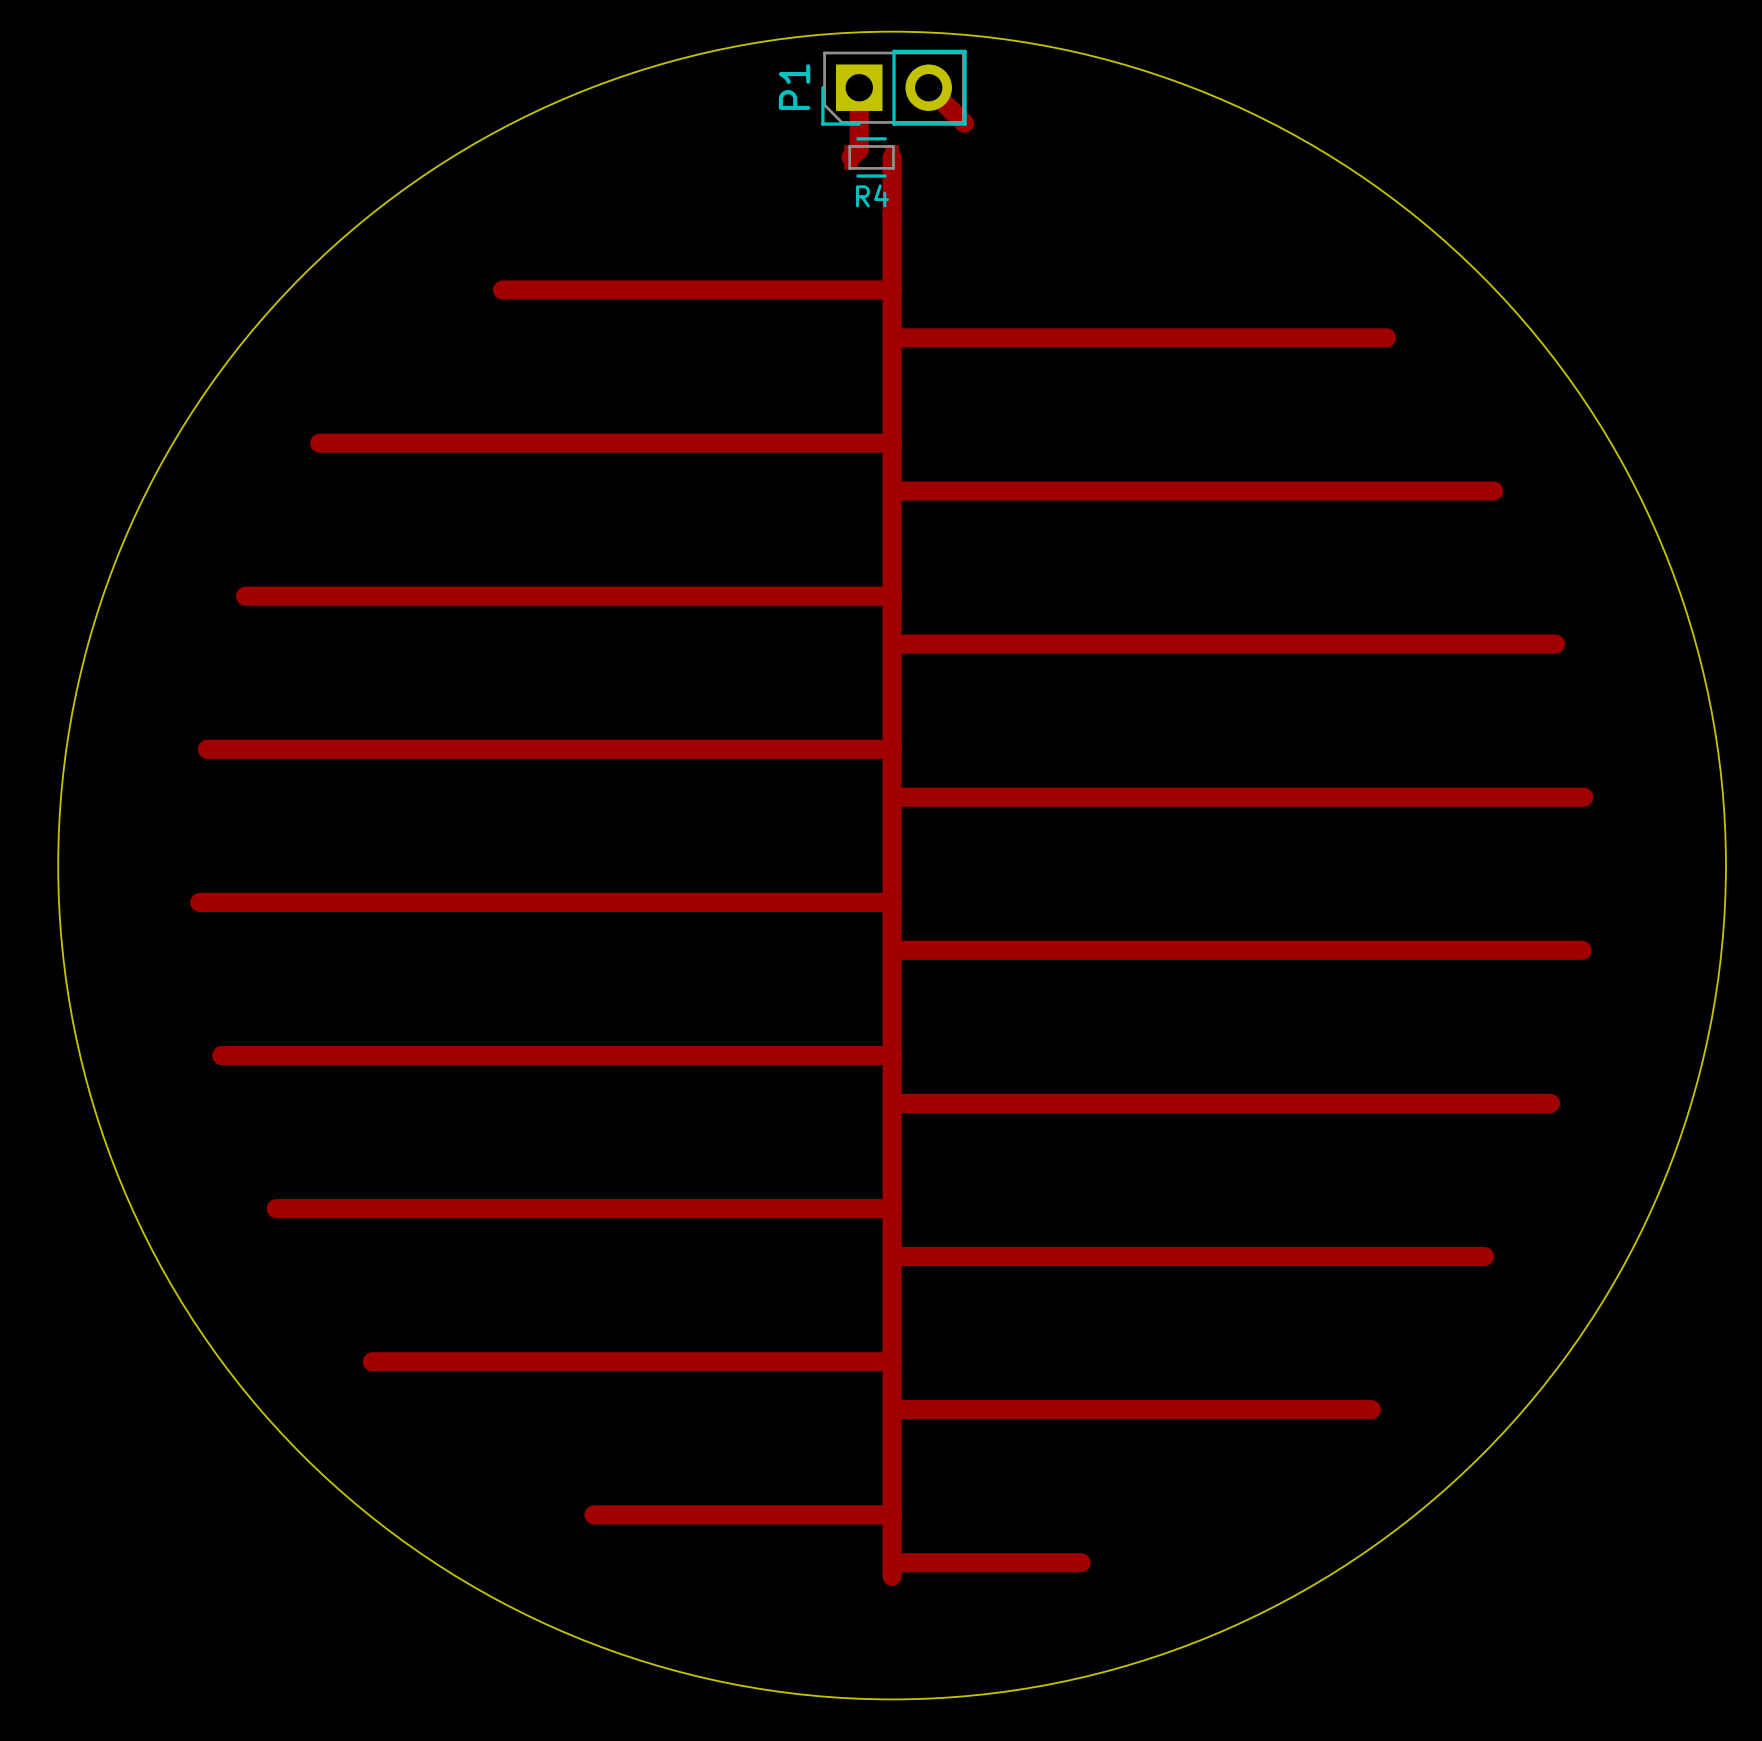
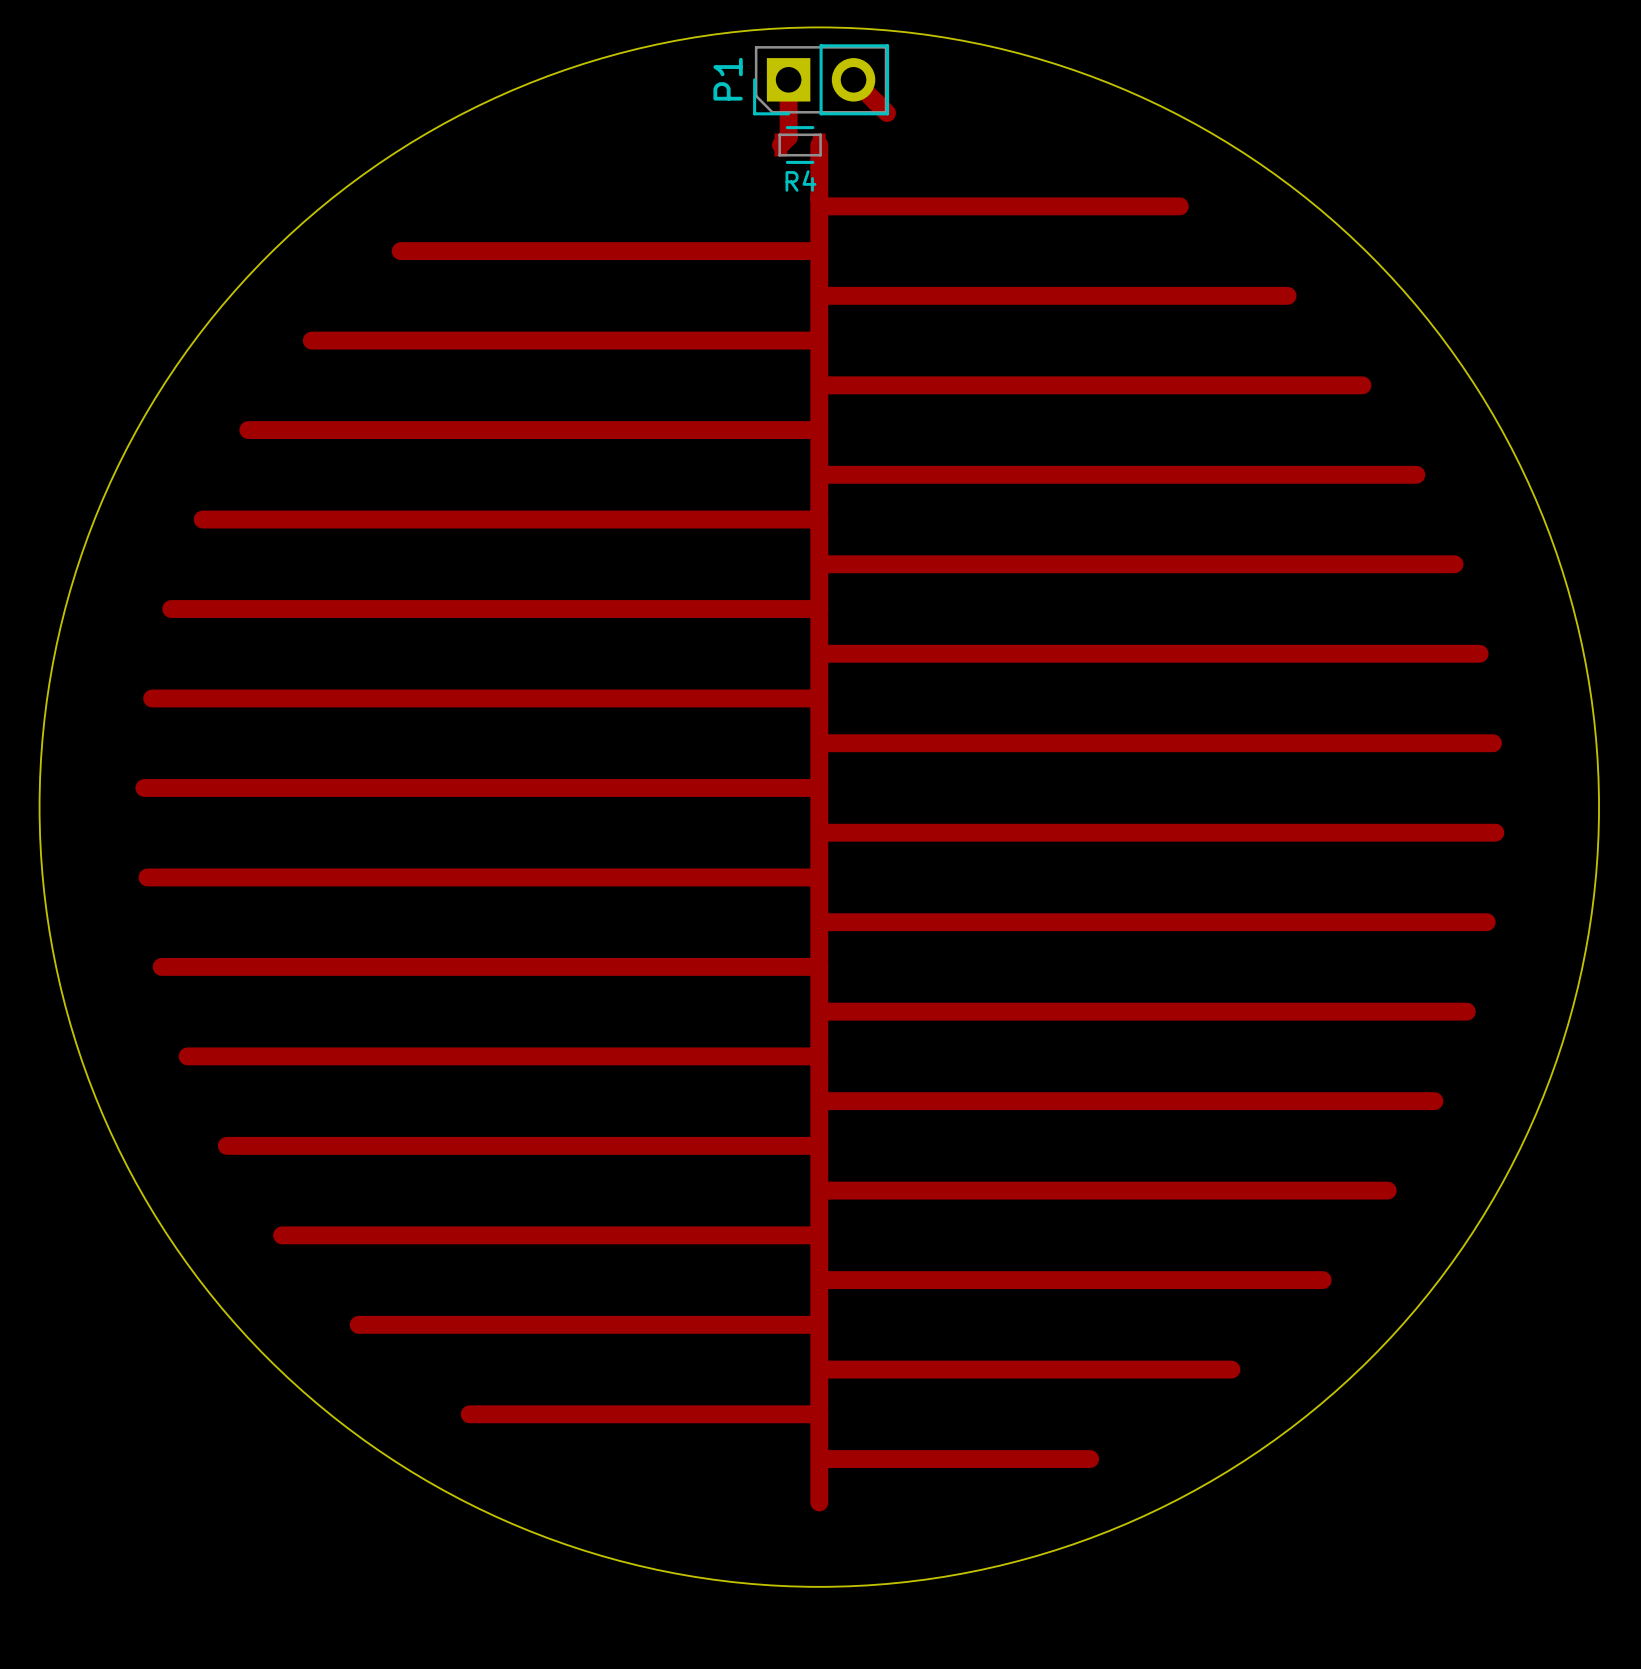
top track: none -> (820, 206) (1179, 206)
top track: none -> (400, 251) (819, 251)
top track: (502, 290) (892, 290) -> none
top track: none -> (820, 295) (1287, 295)
top track: (893, 337) (1386, 337) -> none
top track: none -> (311, 340) (819, 340)
top track: none -> (820, 385) (1362, 385)
top track: (319, 443) (892, 443) -> none
top track: none -> (248, 430) (819, 430)
top track: (893, 490) (1493, 490) -> none
top track: none -> (820, 474) (1416, 474)
top track: none -> (202, 519) (819, 519)
top track: (245, 596) (892, 596) -> none
top track: none -> (820, 564) (1454, 564)
top track: (893, 644) (1555, 644) -> none
top track: none -> (171, 609) (819, 609)
top track: none -> (820, 653) (1479, 653)
top track: none -> (152, 698) (179, 698)
top track: none -> (1466, 743) (1493, 743)
top track: none -> (144, 787) (819, 787)
top track: none -> (820, 832) (1495, 832)
top track: (199, 902) (892, 902) -> none
top track: none -> (147, 877) (819, 877)
top track: (893, 950) (1582, 950) -> none
top track: none -> (820, 922) (1486, 922)
top track: none -> (161, 966) (819, 966)
top track: (221, 1055) (892, 1055) -> none
top track: none -> (820, 1011) (1466, 1011)
top track: (893, 1103) (1550, 1103) -> none
top track: none -> (187, 1056) (819, 1056)
top track: none -> (820, 1101) (1434, 1101)
top track: (276, 1208) (892, 1208) -> none
top track: none -> (226, 1145) (819, 1145)
top track: (893, 1256) (1484, 1256) -> none
top track: none -> (820, 1190) (1387, 1190)
top track: none -> (282, 1235) (819, 1235)
top track: (372, 1361) (892, 1361) -> none
top track: none -> (820, 1280) (1322, 1280)
top track: (893, 1409) (1371, 1409) -> none
top track: none -> (358, 1324) (819, 1324)
top track: none -> (820, 1369) (1231, 1369)
top track: none -> (469, 1414) (540, 1414)
top track: none -> (996, 1459) (1090, 1459)
top track: none -> (819, 1471) (819, 1502)

